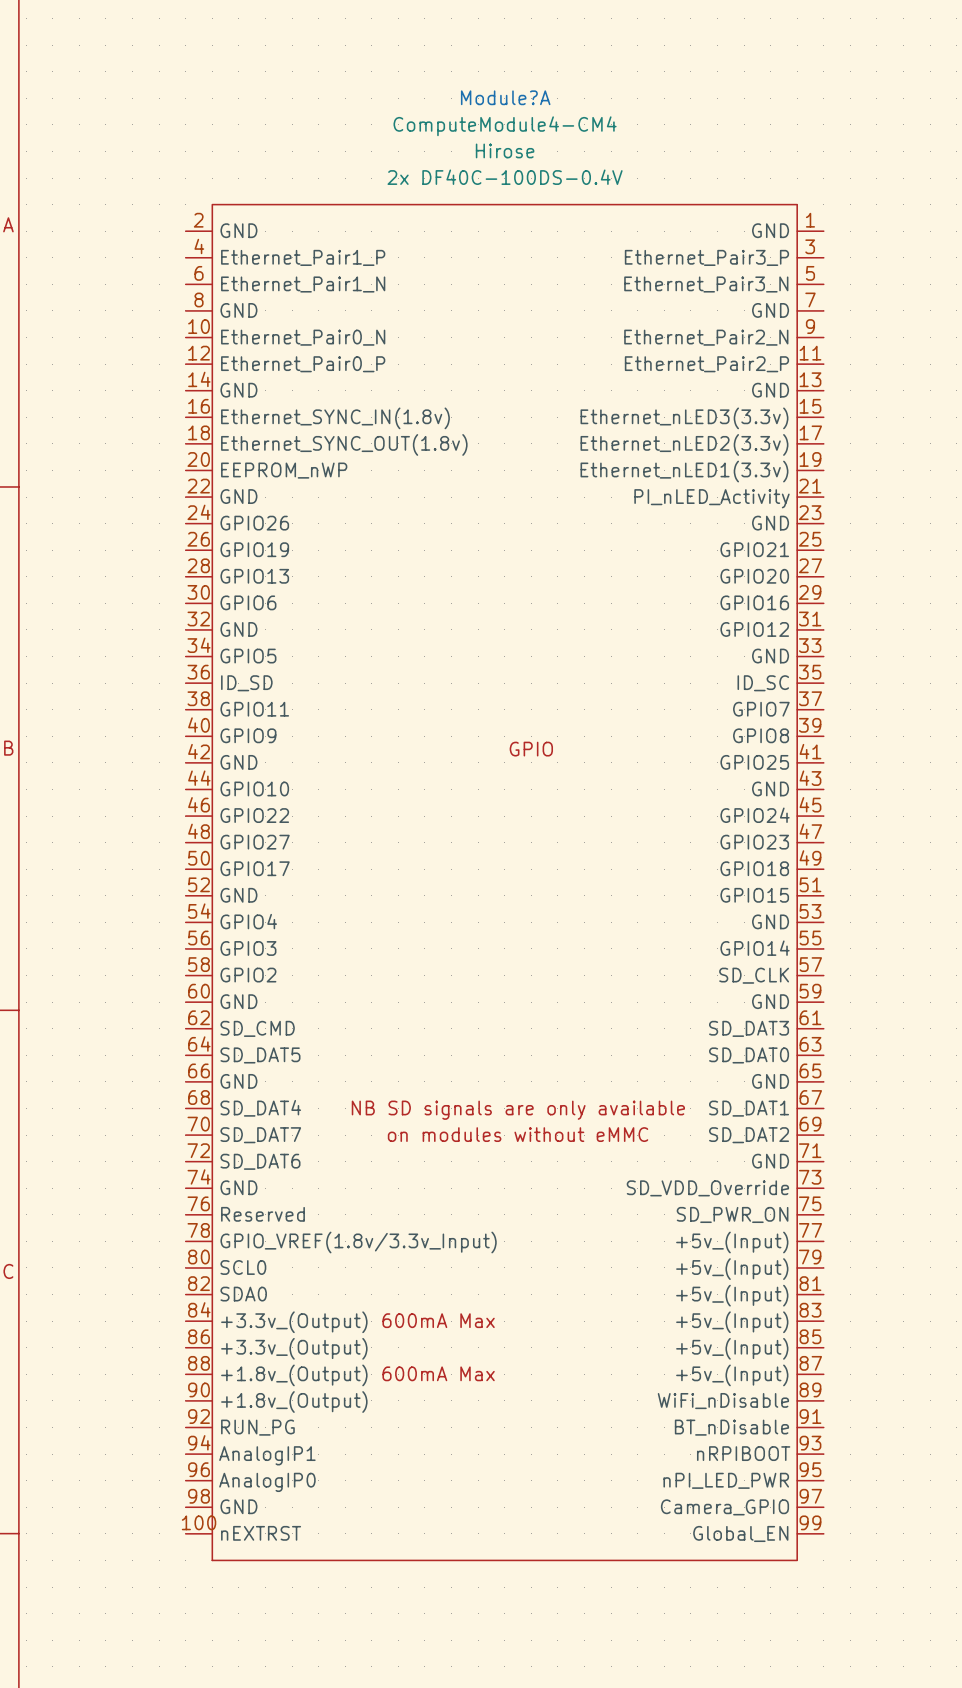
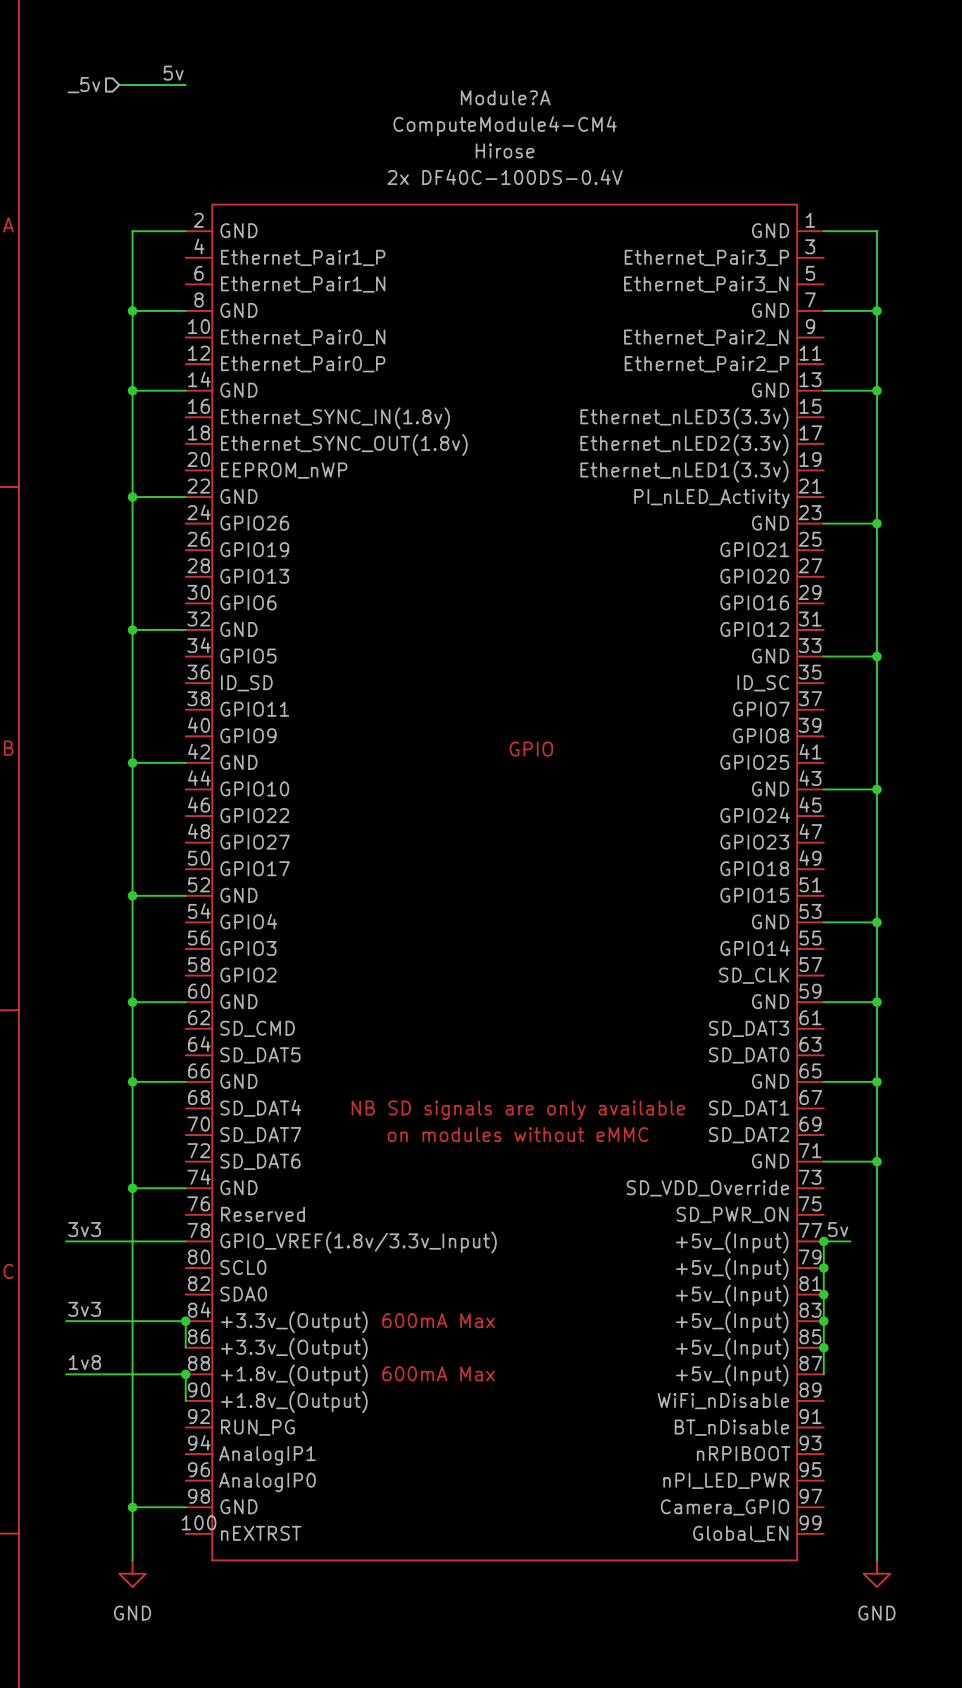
label: none -> 5v (173, 73)
wire: none -> (119, 84) (185, 84)
hierarchical label: none -> _5v (83, 85)
wire: none -> (185, 231) (132, 231) (132, 1560)
wire: none -> (823, 231) (876, 231) (876, 1560)
wire: none -> (132, 310) (185, 310)
junction: none -> (132, 310)
wire: none -> (823, 310) (876, 310)
junction: none -> (876, 310)
wire: none -> (132, 390) (185, 390)
junction: none -> (132, 390)
wire: none -> (823, 390) (876, 390)
junction: none -> (876, 390)
wire: none -> (132, 497) (185, 497)
junction: none -> (132, 497)
wire: none -> (823, 523) (876, 523)
junction: none -> (876, 523)
wire: none -> (132, 629) (185, 629)
junction: none -> (132, 629)
wire: none -> (823, 656) (876, 656)
junction: none -> (876, 656)
wire: none -> (132, 762) (185, 762)
junction: none -> (132, 762)
wire: none -> (823, 789) (876, 789)
junction: none -> (876, 789)
wire: none -> (132, 895) (185, 895)
junction: none -> (132, 895)
wire: none -> (823, 922) (876, 922)
junction: none -> (876, 922)
wire: none -> (132, 1002) (185, 1002)
junction: none -> (132, 1002)
wire: none -> (823, 1002) (876, 1002)
junction: none -> (876, 1002)
wire: none -> (132, 1081) (185, 1081)
junction: none -> (132, 1081)
wire: none -> (823, 1081) (876, 1081)
junction: none -> (876, 1081)
wire: none -> (823, 1161) (876, 1161)
junction: none -> (876, 1161)
wire: none -> (132, 1188) (185, 1188)
junction: none -> (132, 1188)
label: none -> 3v3 (84, 1229)
label: none -> 5v (838, 1229)
wire: none -> (66, 1241) (185, 1241)
junction: none -> (823, 1241)
wire: none -> (850, 1241) (823, 1241) (823, 1374)
junction: none -> (823, 1267)
junction: none -> (823, 1294)
label: none -> 3v3 (84, 1309)
wire: none -> (66, 1321) (185, 1321) (185, 1347)
junction: none -> (185, 1321)
junction: none -> (823, 1321)
junction: none -> (823, 1347)
label: none -> 1v8 (84, 1362)
wire: none -> (66, 1374) (185, 1374) (185, 1400)
junction: none -> (185, 1374)
wire: none -> (132, 1507) (185, 1507)
junction: none -> (132, 1507)
power symbol: none -> GND (132, 1573)
power symbol: none -> GND (876, 1573)

